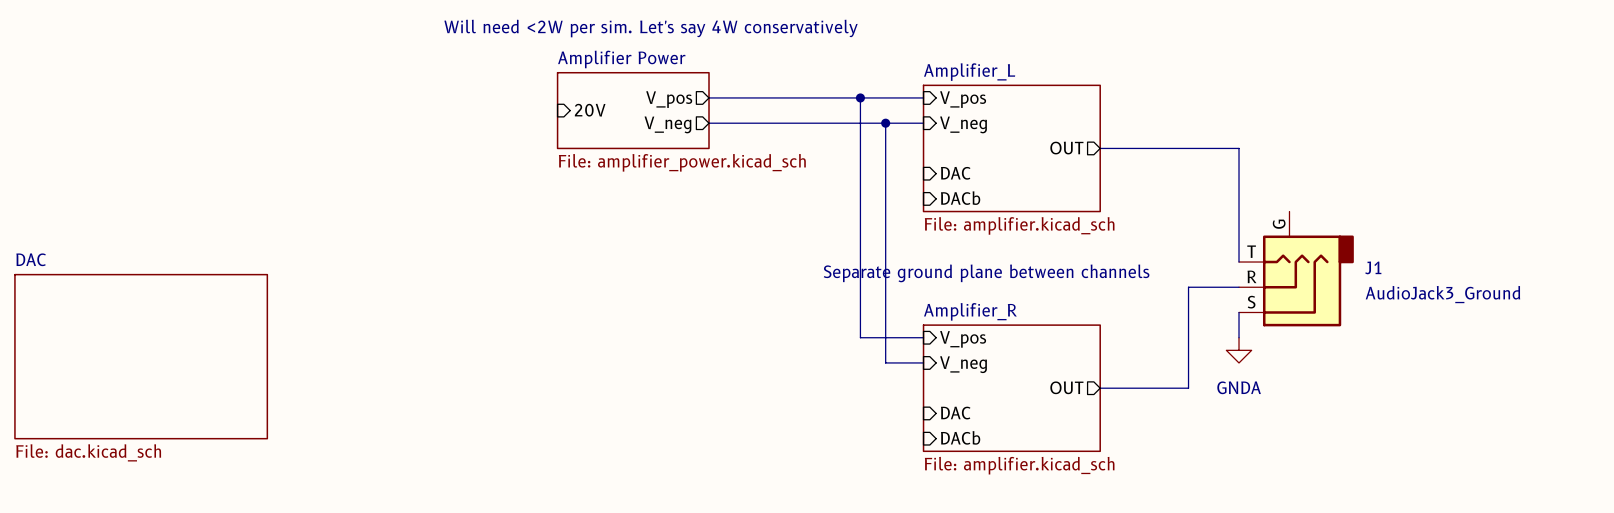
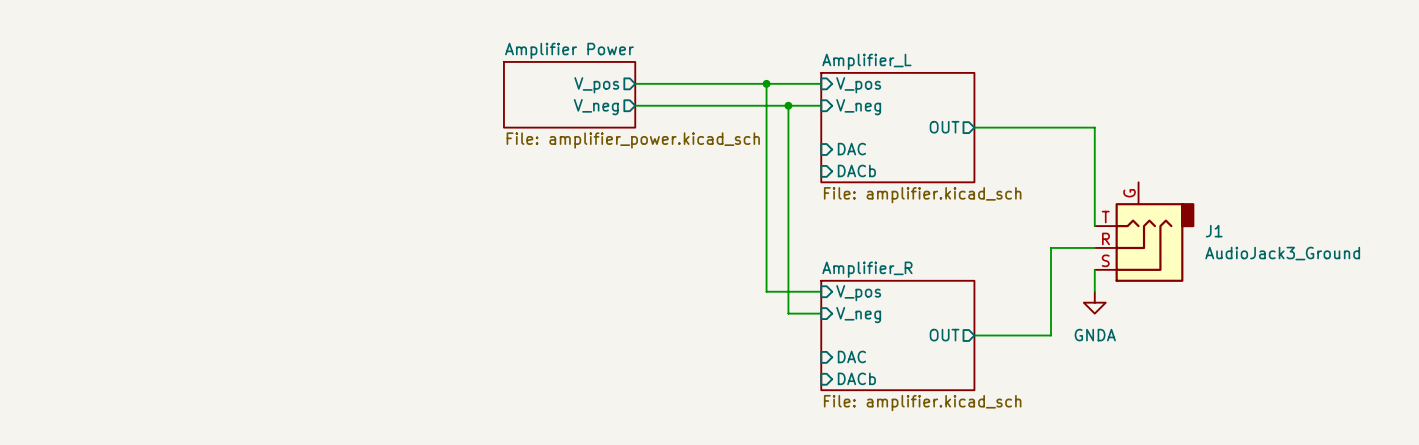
text: Will need <2W per sim. Let's say 4W conservatively (651, 28) -> none
sheet pin: 20V (590, 110) -> none
text: Separate ground plane between channels (986, 273) -> none
sheet DAC: File: dac.kicad_sch (141, 356) -> none

